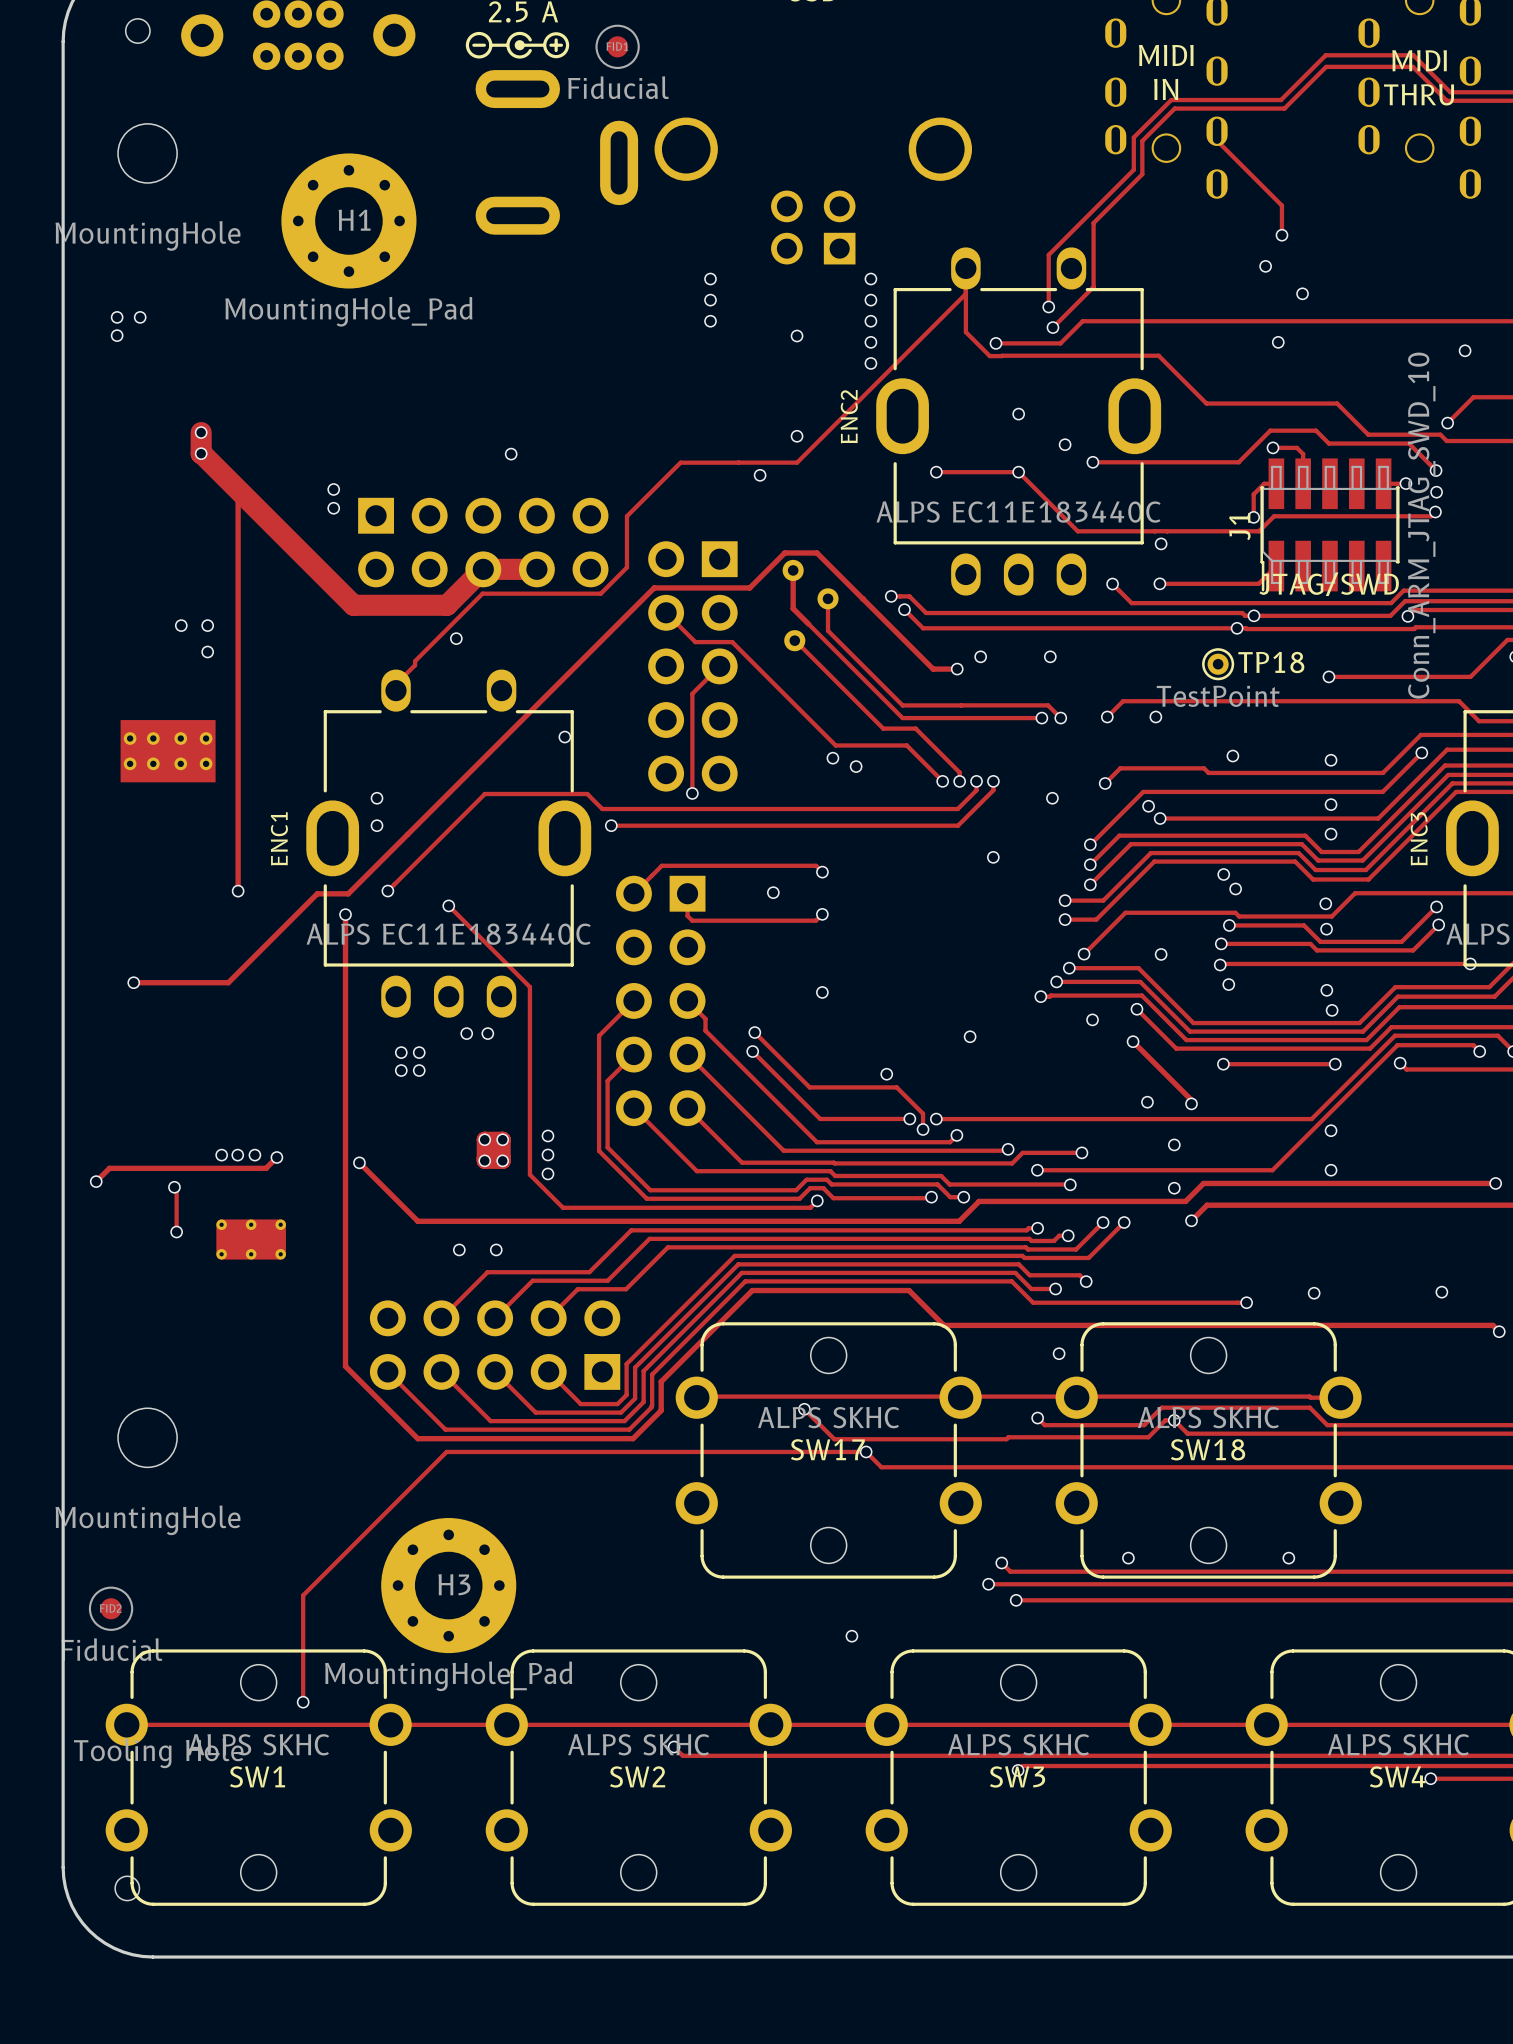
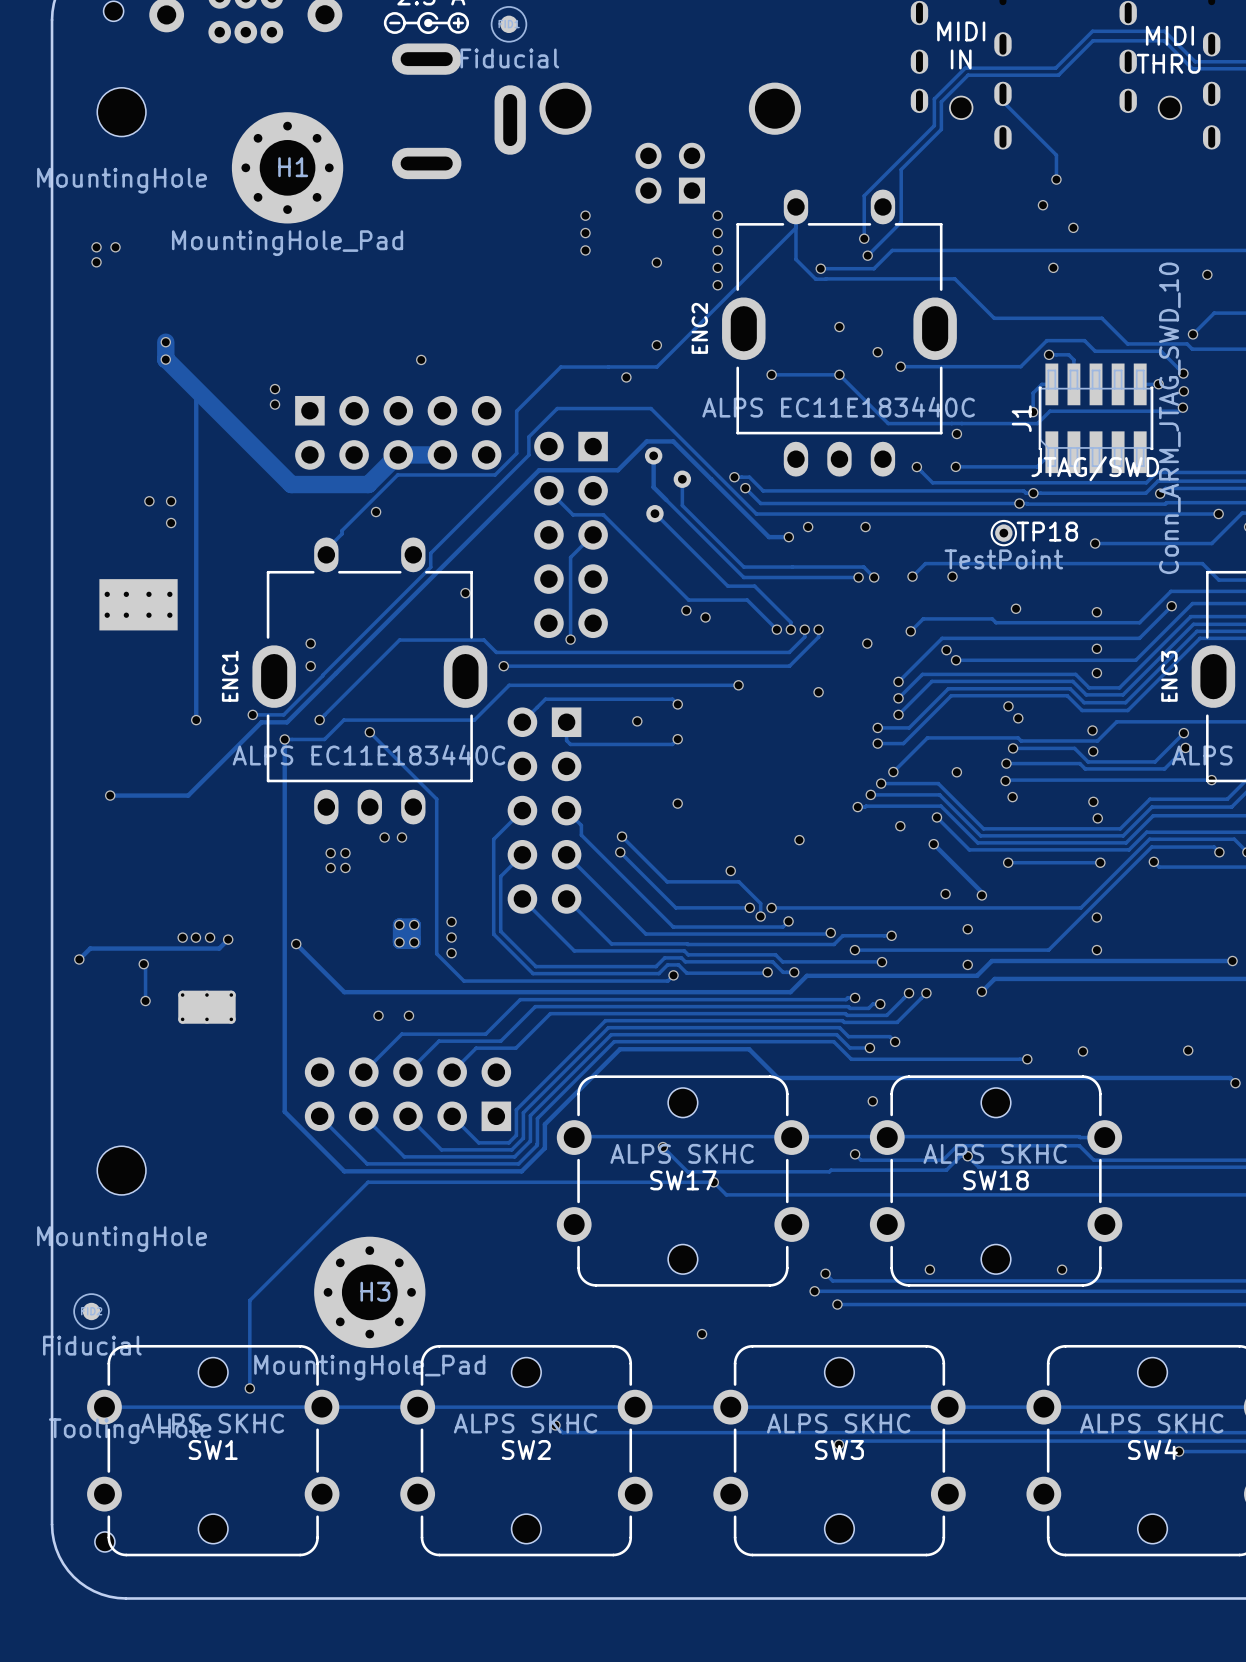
track: none -> (1218, 514) (756, 514) (650, 408) (557, 408) (528, 436) (528, 455) (430, 553) (430, 567) (283, 714) (252, 714)
via: none -> (1218, 513)
track: none -> (738, 685) (509, 685) (474, 720) (343, 720) (324, 739) (284, 739)
via: none -> (738, 685)
via: none -> (252, 714)

